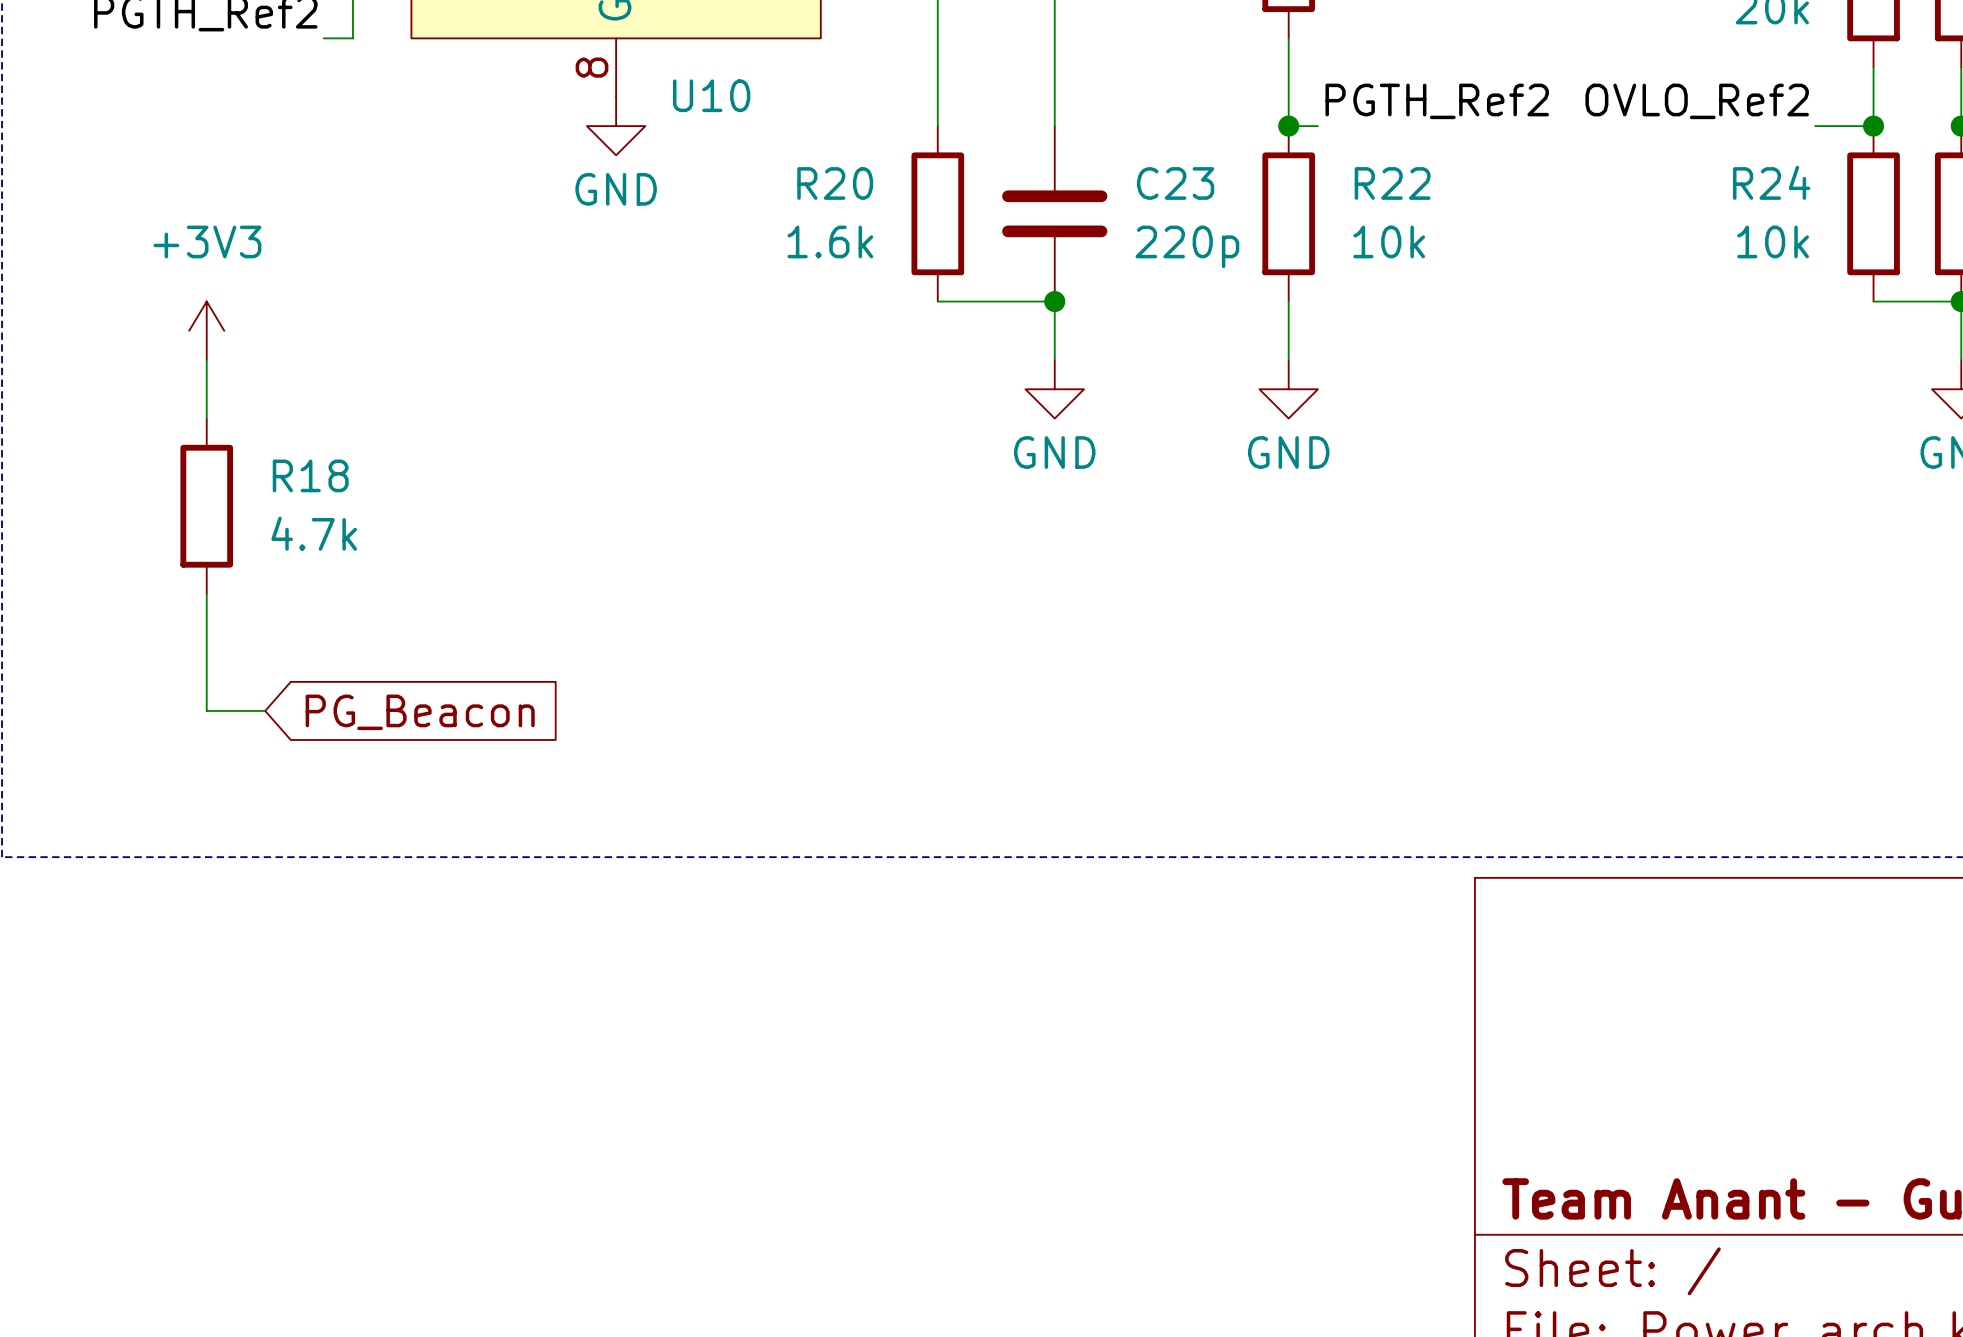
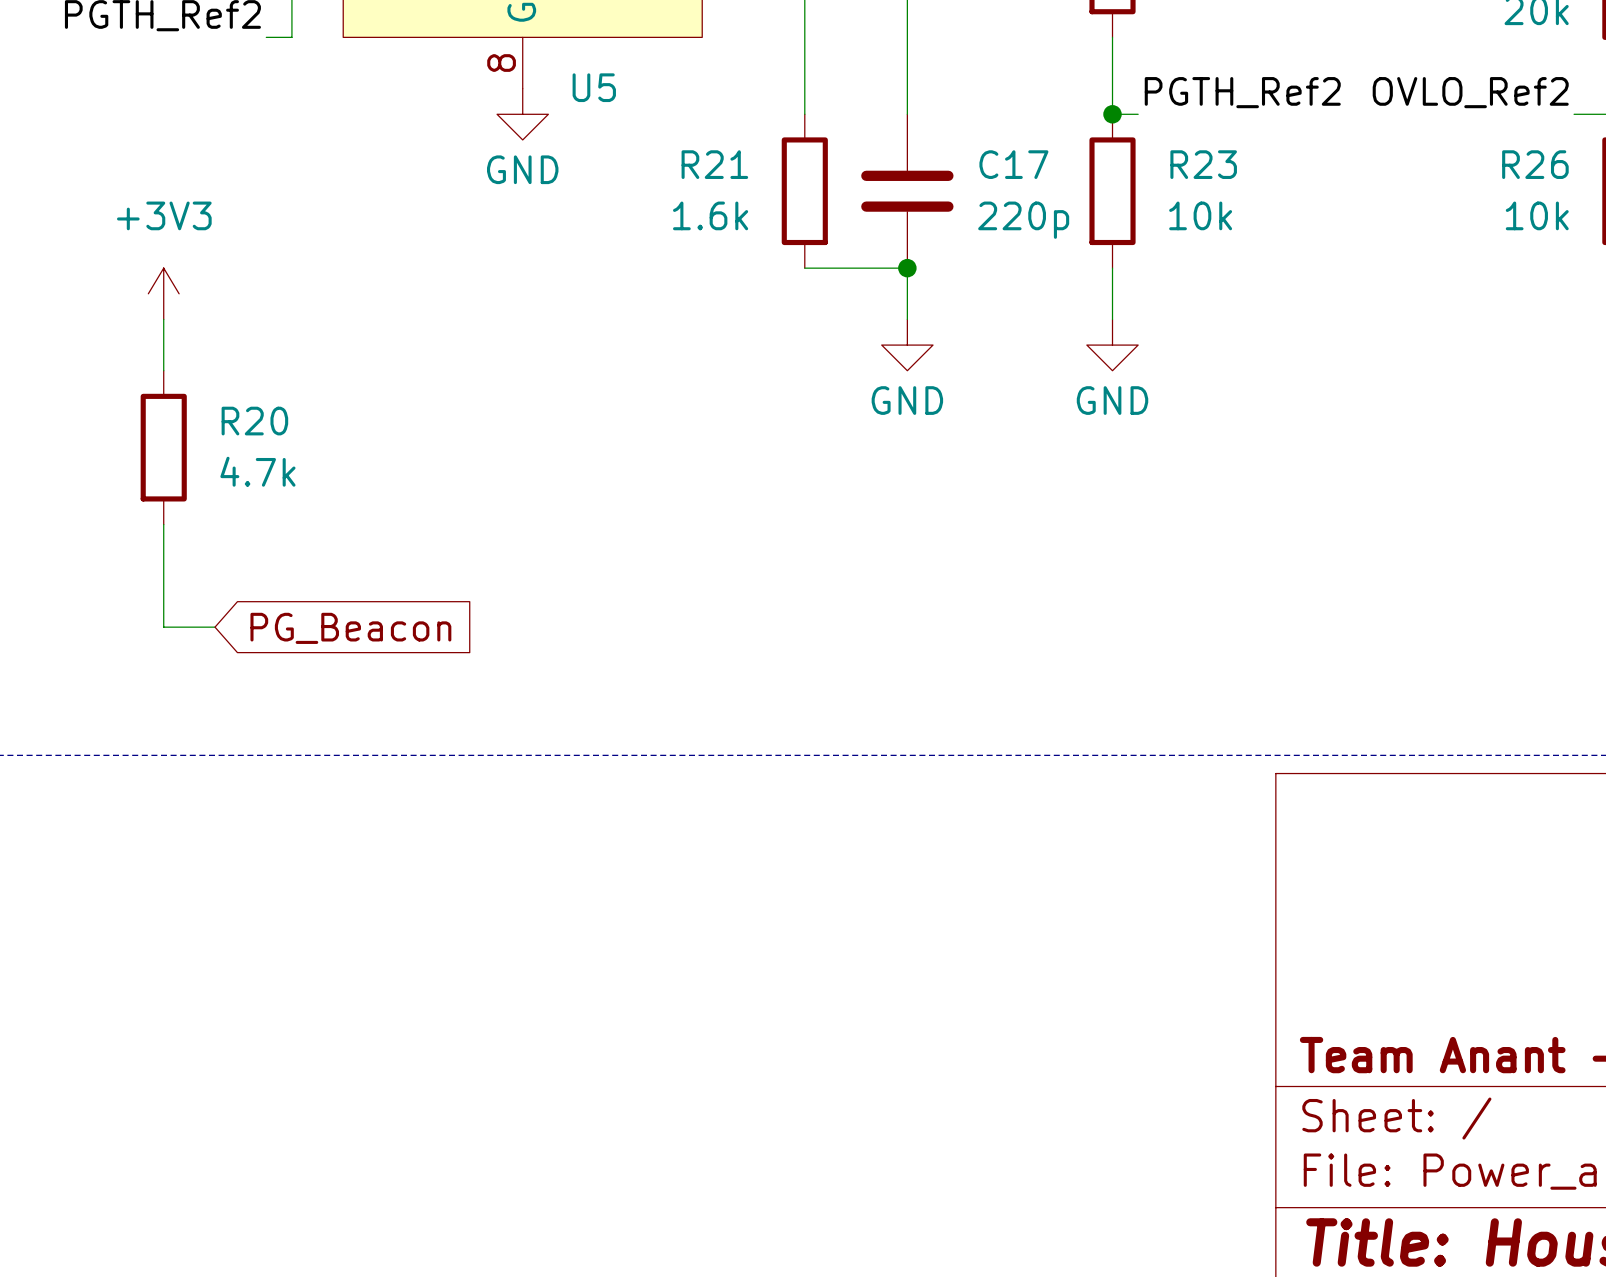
U10 name: U10 (711, 95) -> U5 (594, 87)
R24 name: R24 (1771, 182) -> R26 (1535, 164)
R20 name: R20 (835, 183) -> R21 (714, 164)
C23 name: C23 (1175, 183) -> C17 (1013, 164)
R22 name: R22 (1392, 183) -> R23 (1203, 164)
R18 name: R18 (310, 475) -> R20 (254, 421)

